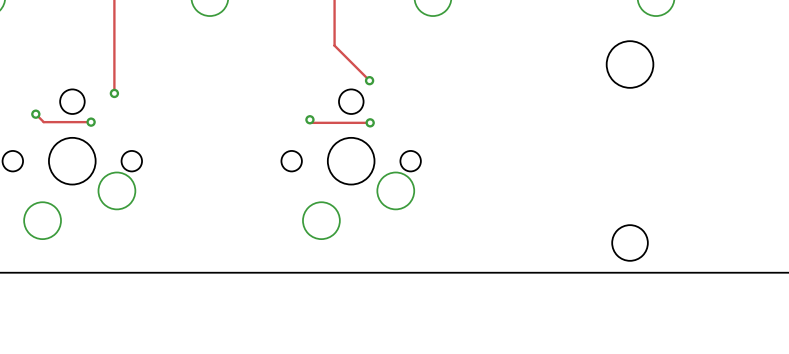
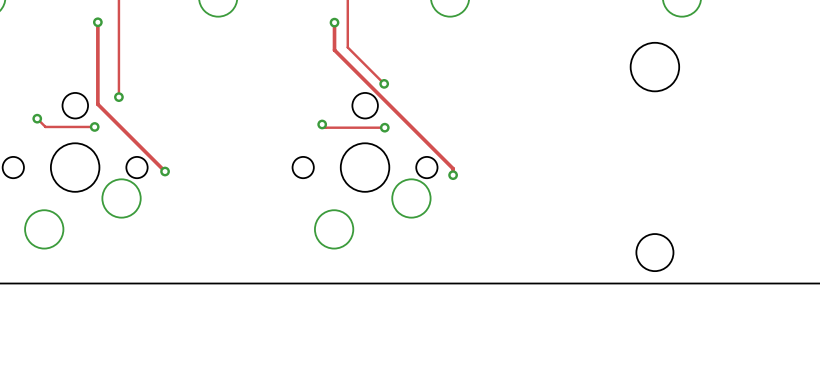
track: none -> (97, 22) (97, 104) (165, 171)
via: none -> (97, 22)
track: none -> (334, 22) (334, 50) (453, 168) (453, 175)
via: none -> (334, 22)
via: none -> (165, 171)
via: none -> (453, 175)

